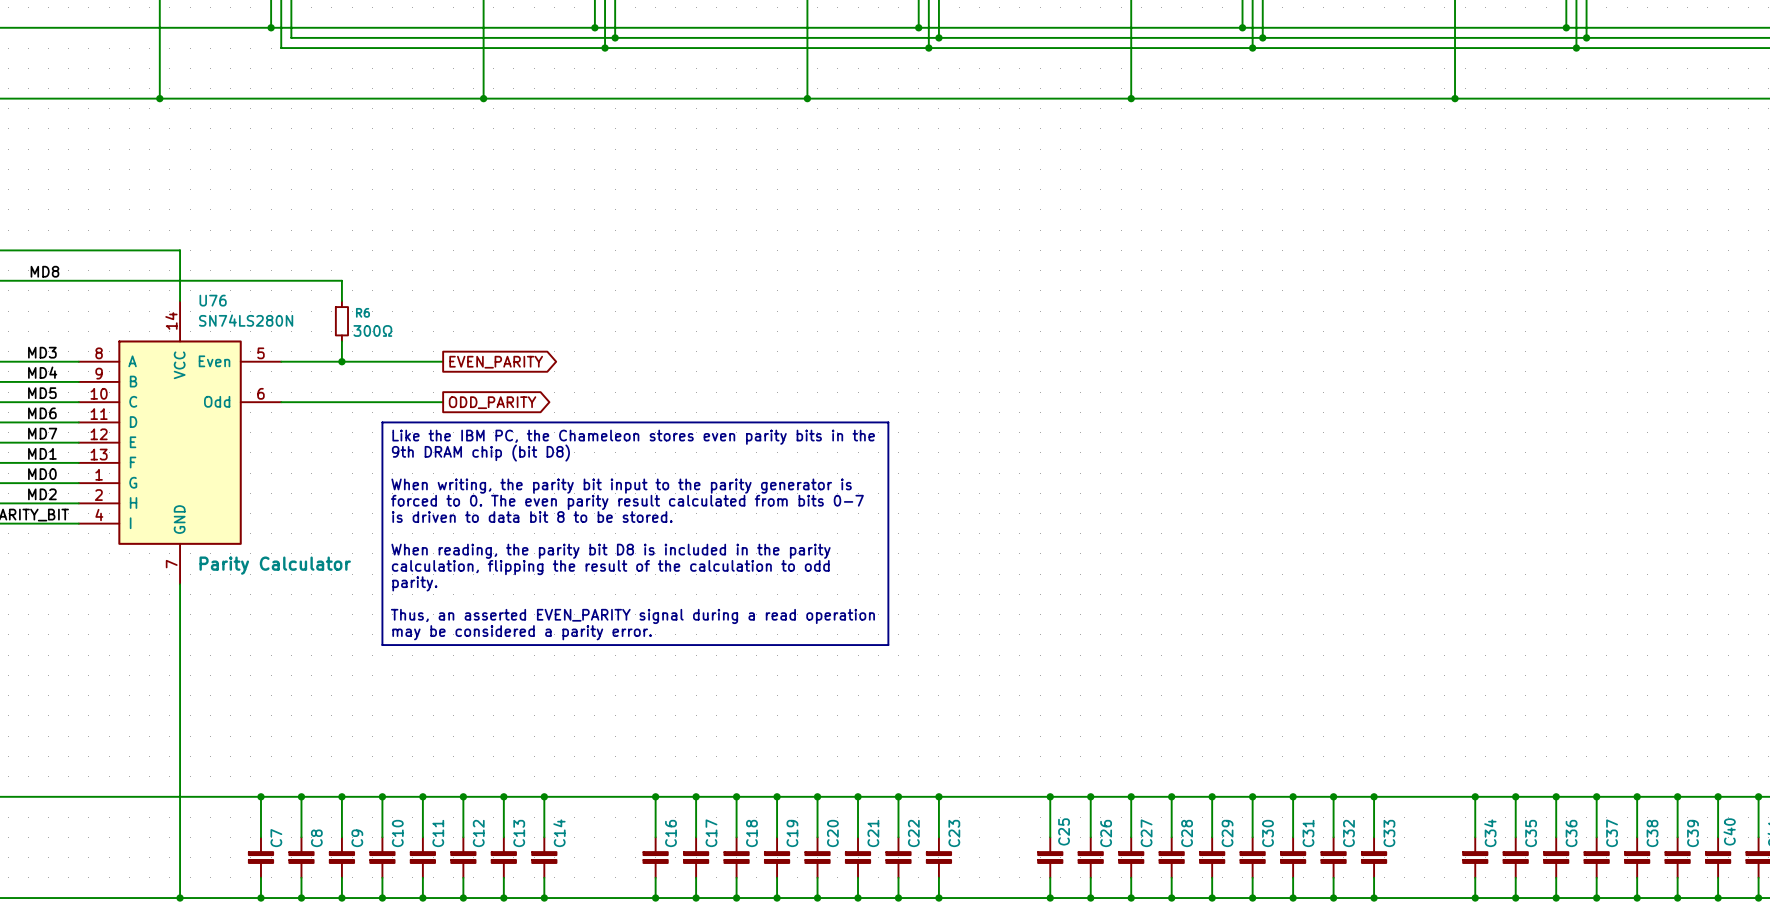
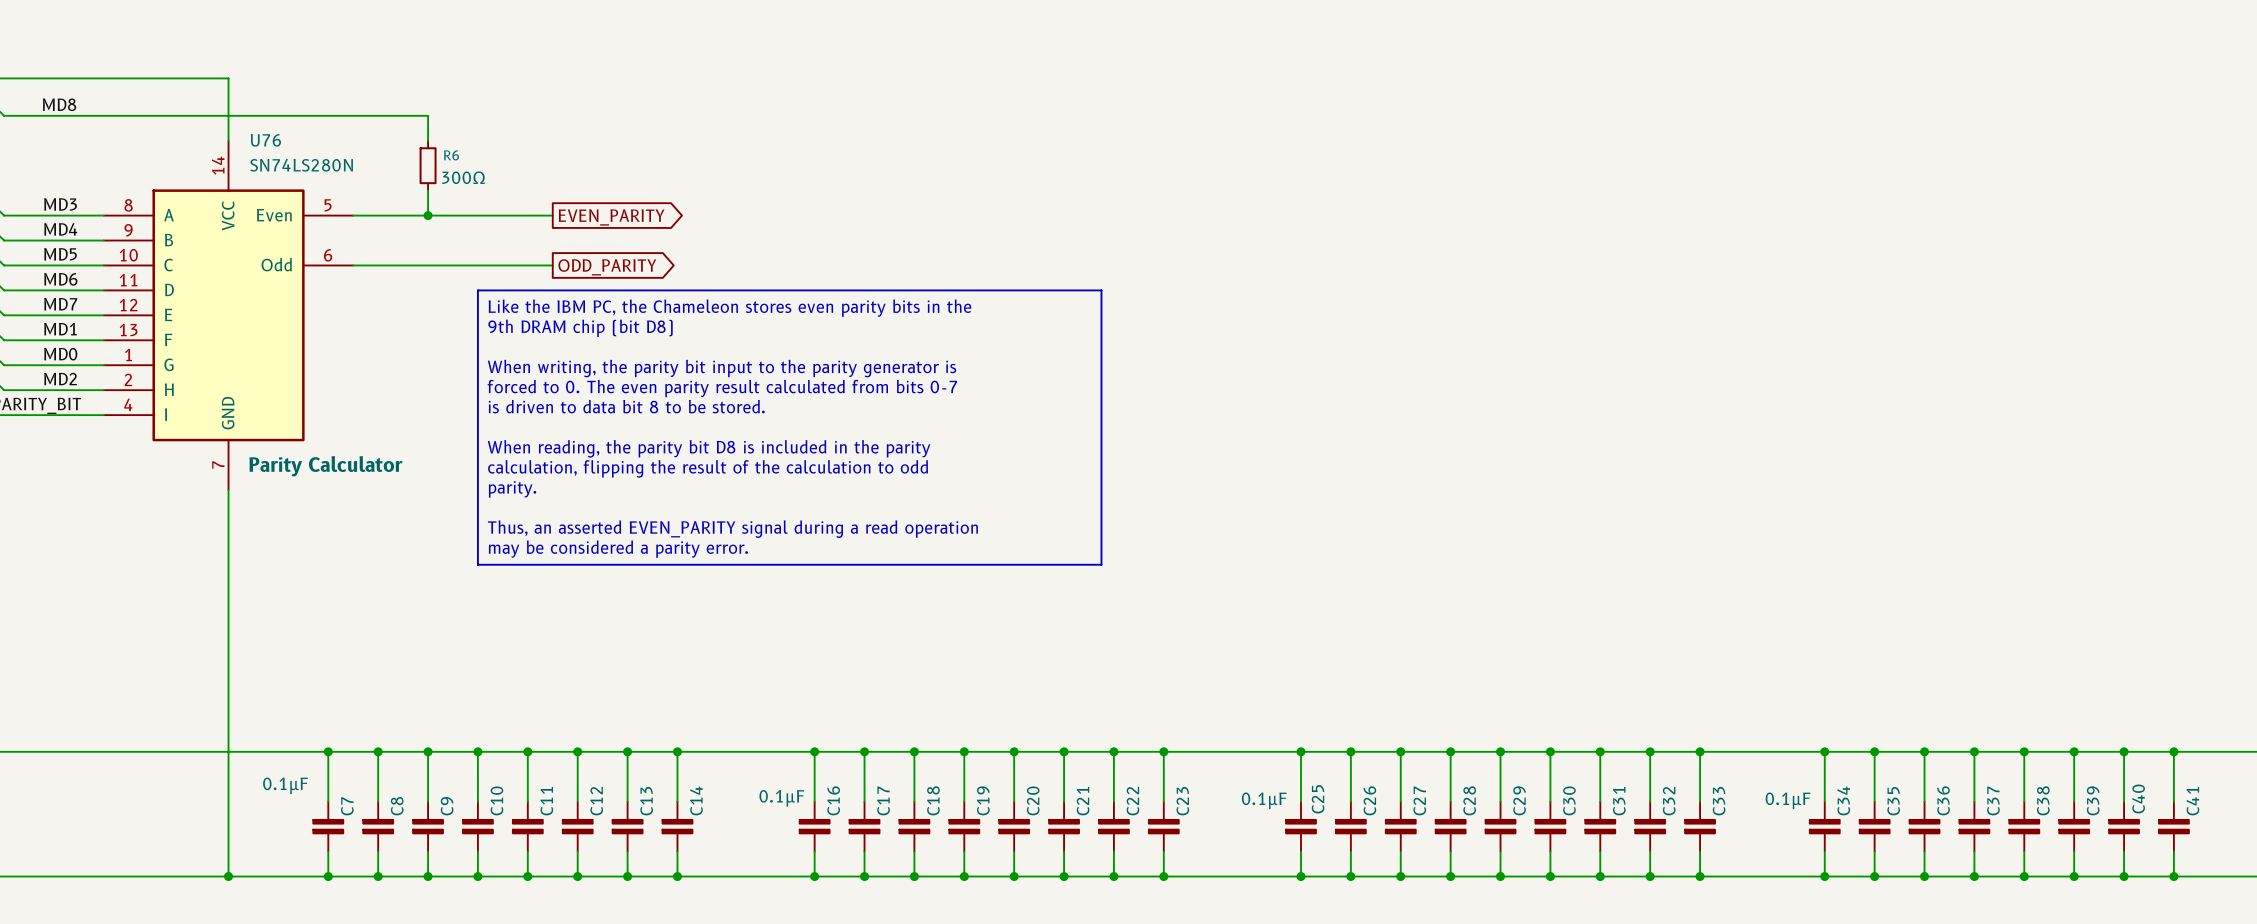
C7 value: none -> 0.1µF (285, 785)
C16 value: none -> 0.1µF (781, 798)
C25 value: none -> 0.1µF (1264, 800)
C34 value: none -> 0.1µF (1788, 800)

